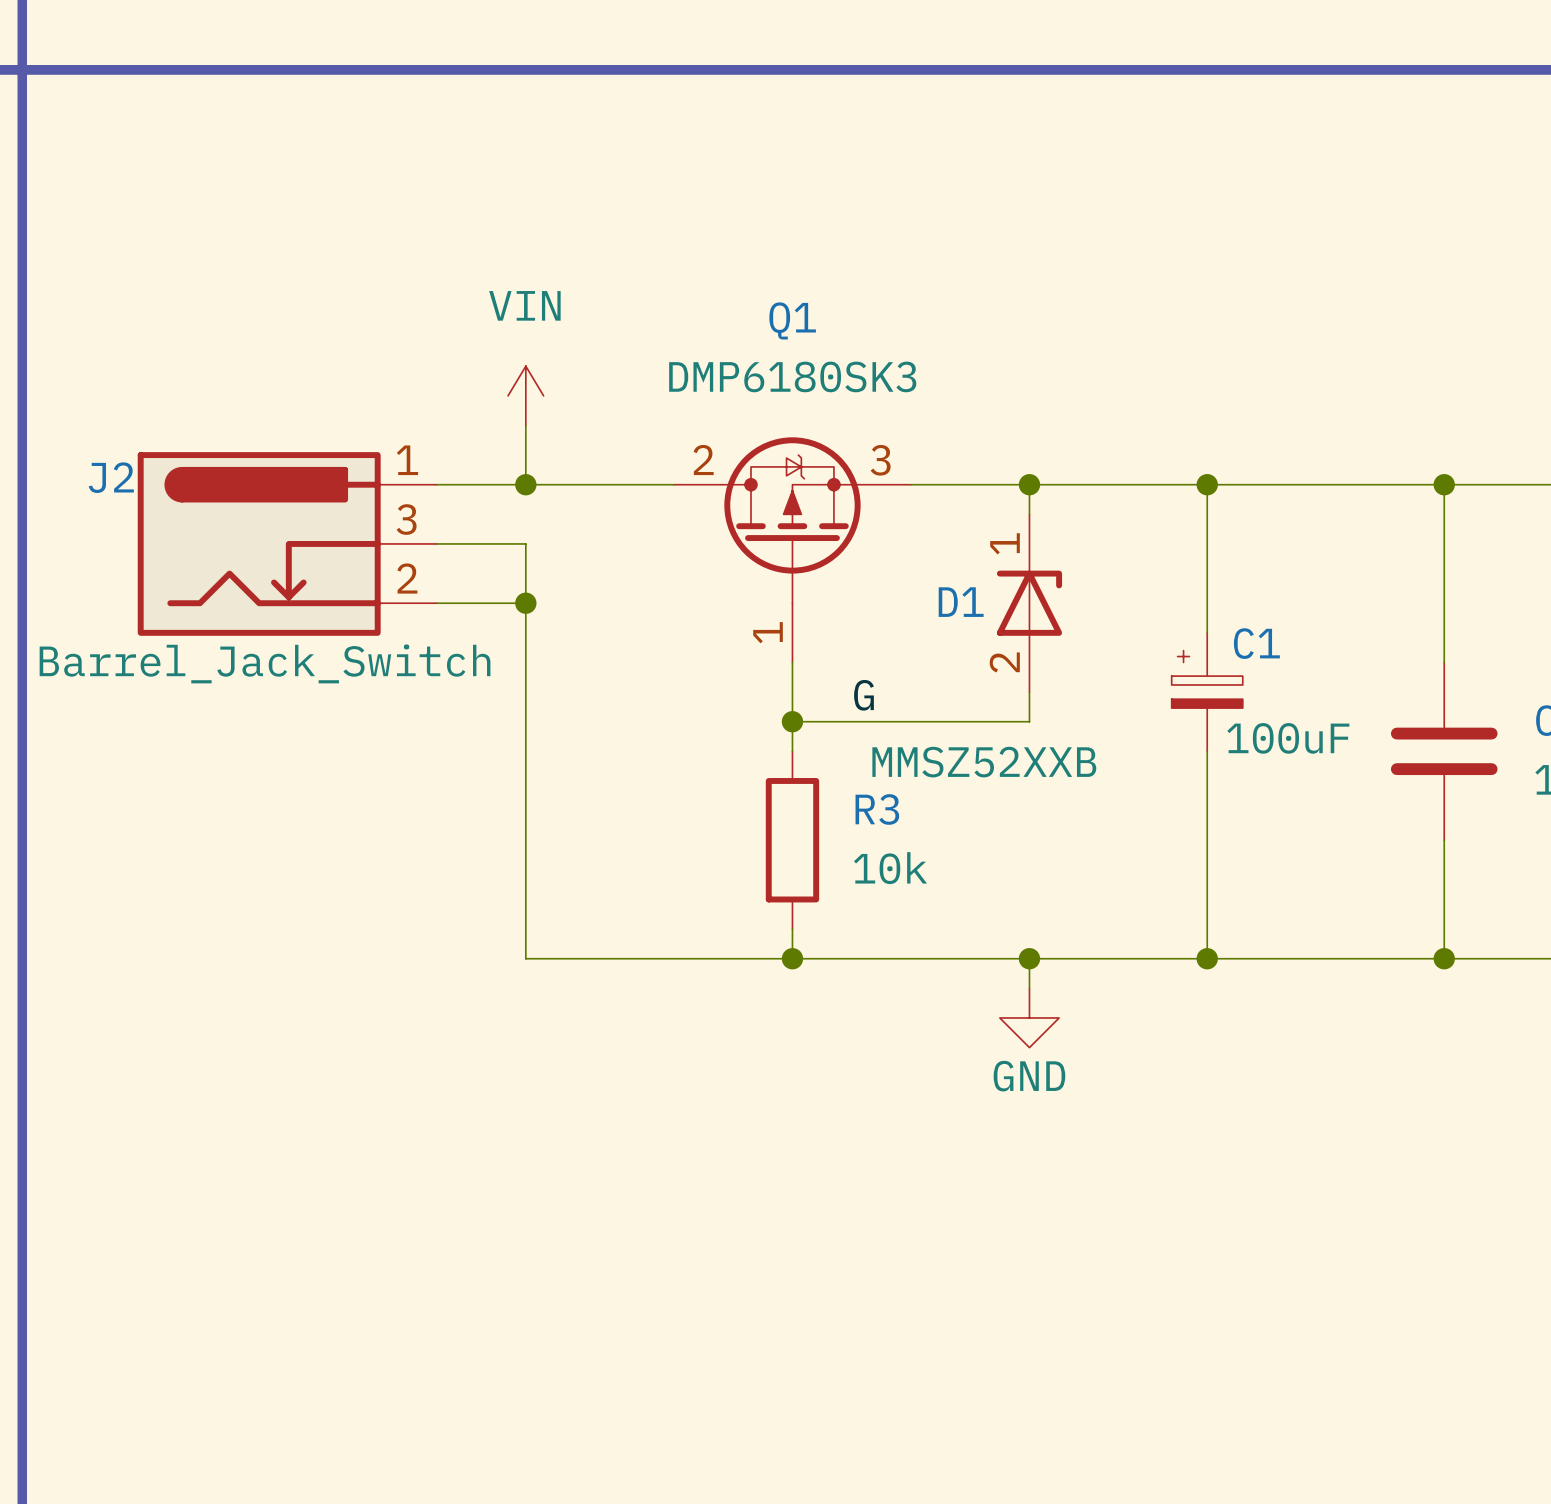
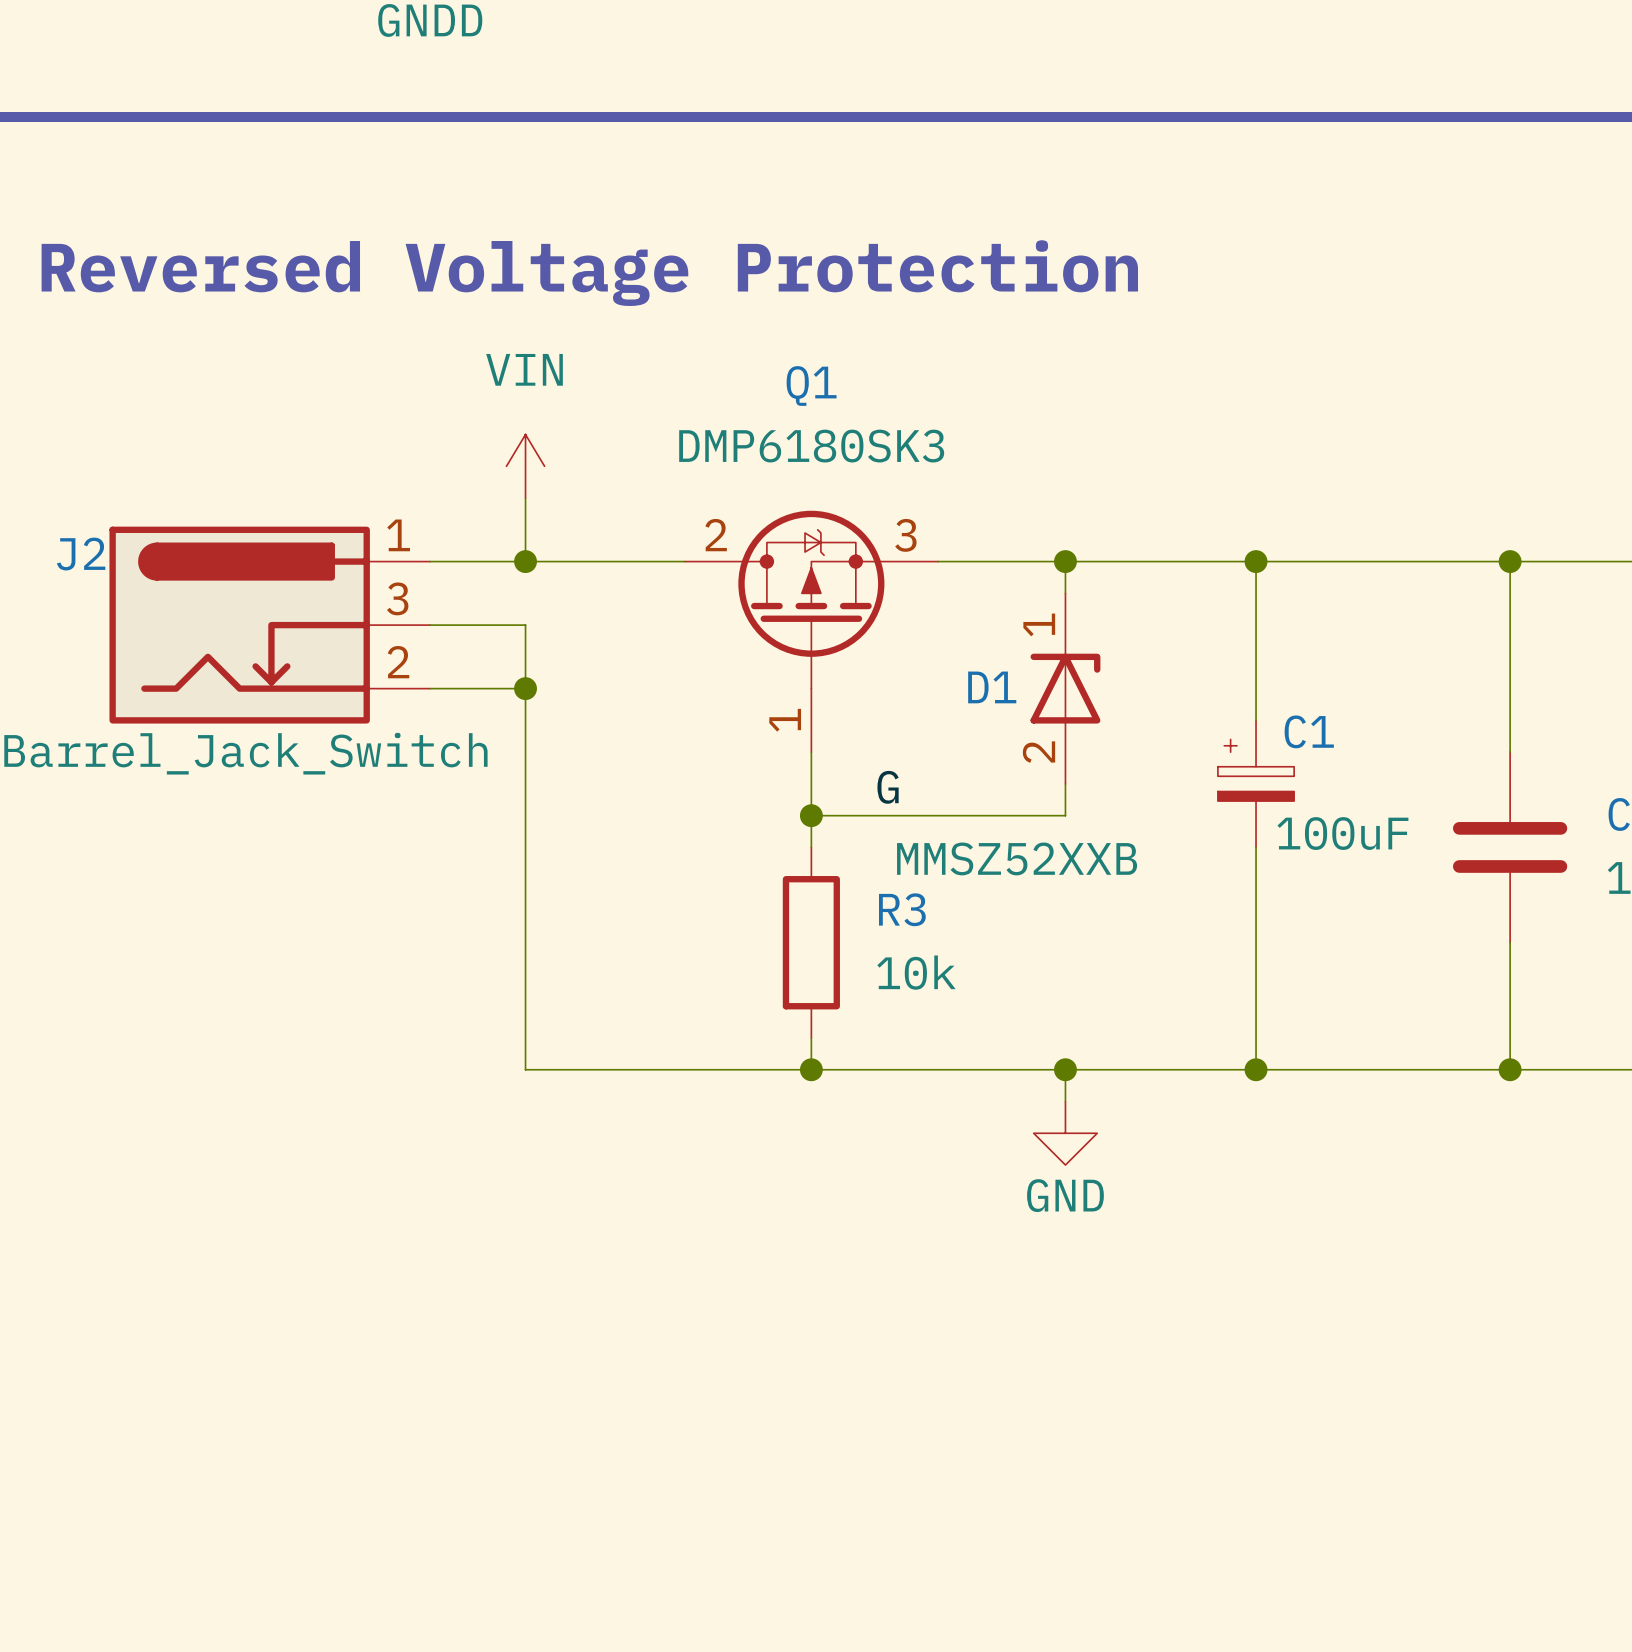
text: none -> Reversed Voltage Protection (589, 273)

